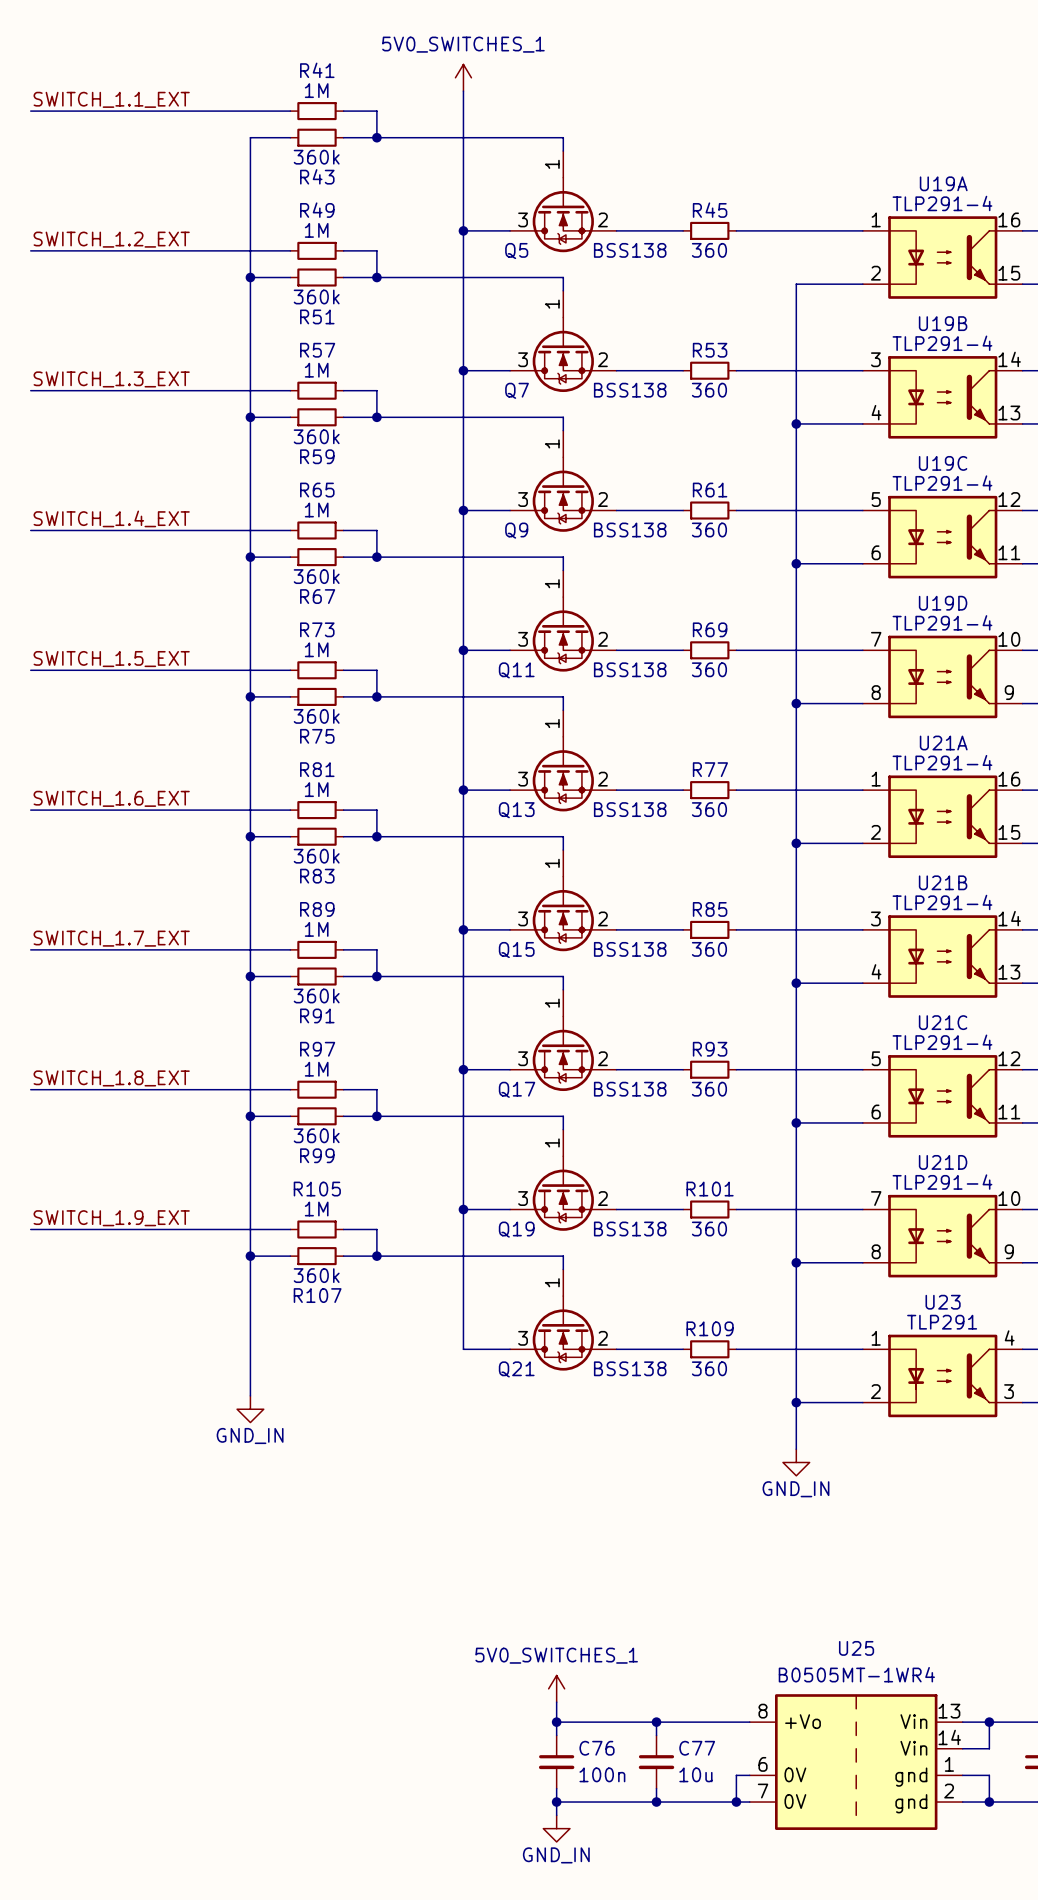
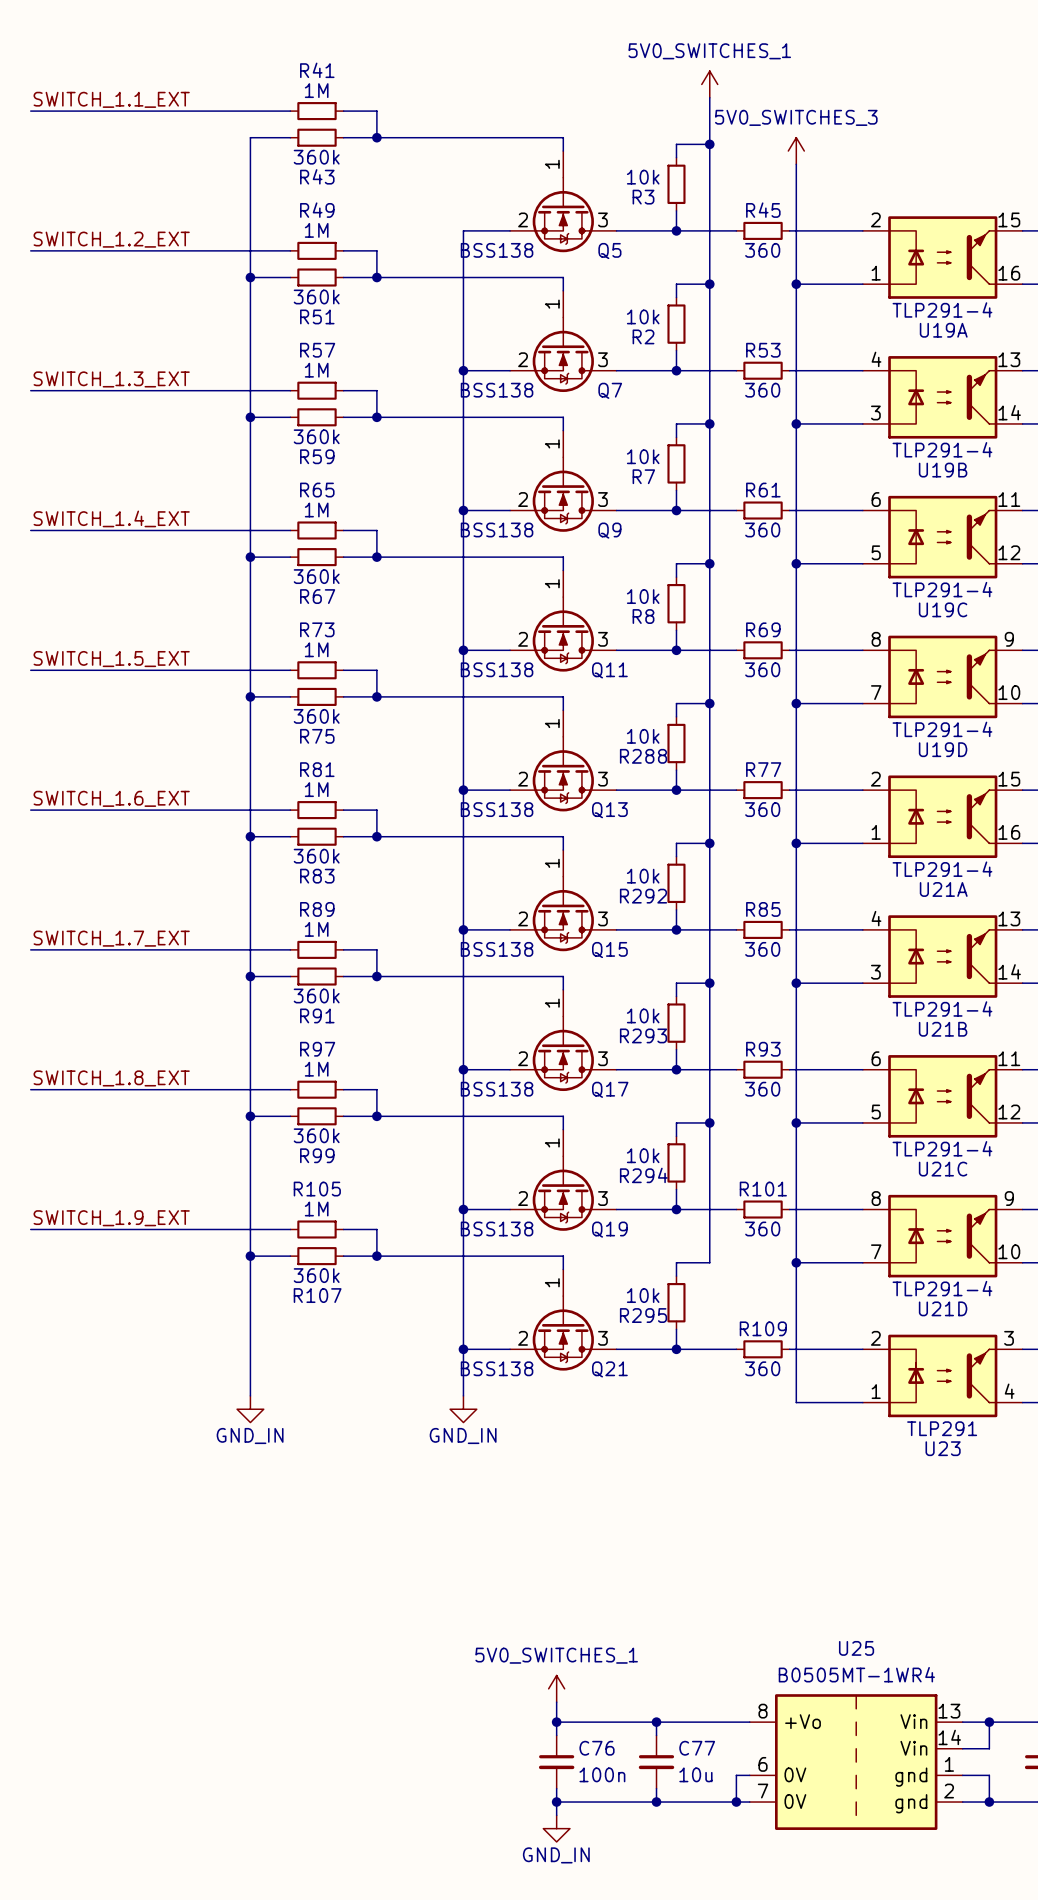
power symbol position: 5V0_SWITCHES_1 (463, 77) -> 5V0_SWITCHES_1 (709, 84)
wire: (463, 91) (463, 230) -> none
wire: none -> (709, 97) (709, 1262) (676, 1262) (676, 1276)
wire: none -> (709, 144) (676, 144) (676, 157)
junction: none -> (709, 144)
power symbol: none -> 5V0_SWITCHES_3 (796, 151)
wire: none -> (796, 164) (796, 284)
R3: none -> 10k (676, 184)
wire: none -> (676, 210) (676, 230)
Q5 flip: as is (563, 214) -> left-right (563, 214)
junction: (463, 230) -> none
junction: none -> (676, 230)
R45 position: (709, 230) -> (763, 230)
wire: (736, 230) (789, 230) -> (736, 230) (683, 230)
U19A flip: as is (942, 257) -> up-down (942, 257)
wire: none -> (709, 284) (676, 284) (676, 297)
junction: none -> (709, 284)
junction: none -> (796, 284)
R2: none -> 10k (676, 324)
wire: none -> (676, 350) (676, 370)
Q7 flip: as is (563, 354) -> left-right (563, 354)
junction: none -> (676, 370)
R53 position: (709, 370) -> (763, 370)
wire: (736, 370) (789, 370) -> (736, 370) (683, 370)
U19B flip: as is (942, 397) -> up-down (942, 397)
wire: none -> (709, 423) (676, 423) (676, 437)
junction: none -> (709, 423)
R7: none -> 10k (676, 463)
wire: none -> (676, 490) (676, 510)
Q9 flip: as is (563, 494) -> left-right (563, 494)
junction: none -> (676, 510)
R61 position: (709, 510) -> (763, 510)
wire: (736, 510) (789, 510) -> (736, 510) (683, 510)
U19C flip: as is (942, 537) -> up-down (942, 537)
wire: none -> (709, 563) (676, 563) (676, 577)
junction: none -> (709, 563)
R8: none -> 10k (676, 603)
wire: none -> (676, 630) (676, 650)
Q11 flip: as is (563, 634) -> left-right (563, 634)
junction: none -> (676, 650)
R69 position: (709, 650) -> (763, 650)
wire: (736, 650) (789, 650) -> (736, 650) (683, 650)
U19D flip: as is (942, 676) -> up-down (942, 676)
wire: none -> (709, 703) (676, 703) (676, 716)
junction: none -> (709, 703)
R288: none -> 10k (676, 743)
wire: none -> (676, 770) (676, 790)
Q13 flip: as is (563, 774) -> left-right (563, 774)
junction: none -> (676, 790)
R77 position: (709, 790) -> (763, 790)
wire: (736, 790) (789, 790) -> (736, 790) (683, 790)
U21A flip: as is (942, 816) -> up-down (942, 816)
wire: none -> (709, 843) (676, 843) (676, 856)
junction: none -> (709, 843)
R292: none -> 10k (676, 883)
wire: none -> (676, 909) (676, 929)
Q15 flip: as is (563, 913) -> left-right (563, 913)
junction: none -> (676, 929)
R85 position: (709, 929) -> (763, 929)
wire: (736, 929) (789, 929) -> (736, 929) (683, 929)
U21B flip: as is (942, 956) -> up-down (942, 956)
wire: none -> (709, 983) (676, 983) (676, 996)
junction: none -> (709, 983)
R293: none -> 10k (676, 1023)
wire: none -> (676, 1049) (676, 1069)
Q17 flip: as is (563, 1053) -> left-right (563, 1053)
junction: none -> (676, 1069)
R93 position: (709, 1069) -> (763, 1069)
wire: (736, 1069) (789, 1069) -> (736, 1069) (683, 1069)
U21C flip: as is (942, 1096) -> up-down (942, 1096)
wire: none -> (709, 1122) (676, 1122) (676, 1136)
junction: none -> (709, 1122)
R294: none -> 10k (676, 1162)
wire: none -> (676, 1189) (676, 1209)
Q19 flip: as is (563, 1193) -> left-right (563, 1193)
junction: none -> (676, 1209)
R101 position: (709, 1209) -> (763, 1209)
wire: (736, 1209) (789, 1209) -> (736, 1209) (683, 1209)
U21D flip: as is (942, 1236) -> up-down (942, 1236)
R295: none -> 10k (676, 1302)
wire: none -> (676, 1329) (676, 1349)
Q21 flip: as is (563, 1333) -> left-right (563, 1333)
wire: none -> (463, 1349) (463, 1395)
junction: none -> (463, 1349)
junction: none -> (676, 1349)
R109 position: (709, 1349) -> (763, 1349)
wire: (736, 1349) (789, 1349) -> (736, 1349) (683, 1349)
U23 flip: as is (942, 1375) -> up-down (942, 1375)
wire: (796, 1402) (796, 1449) -> none
junction: (796, 1402) -> none
power symbol: none -> GND_IN (463, 1409)
power symbol: GND_IN (796, 1462) -> none

